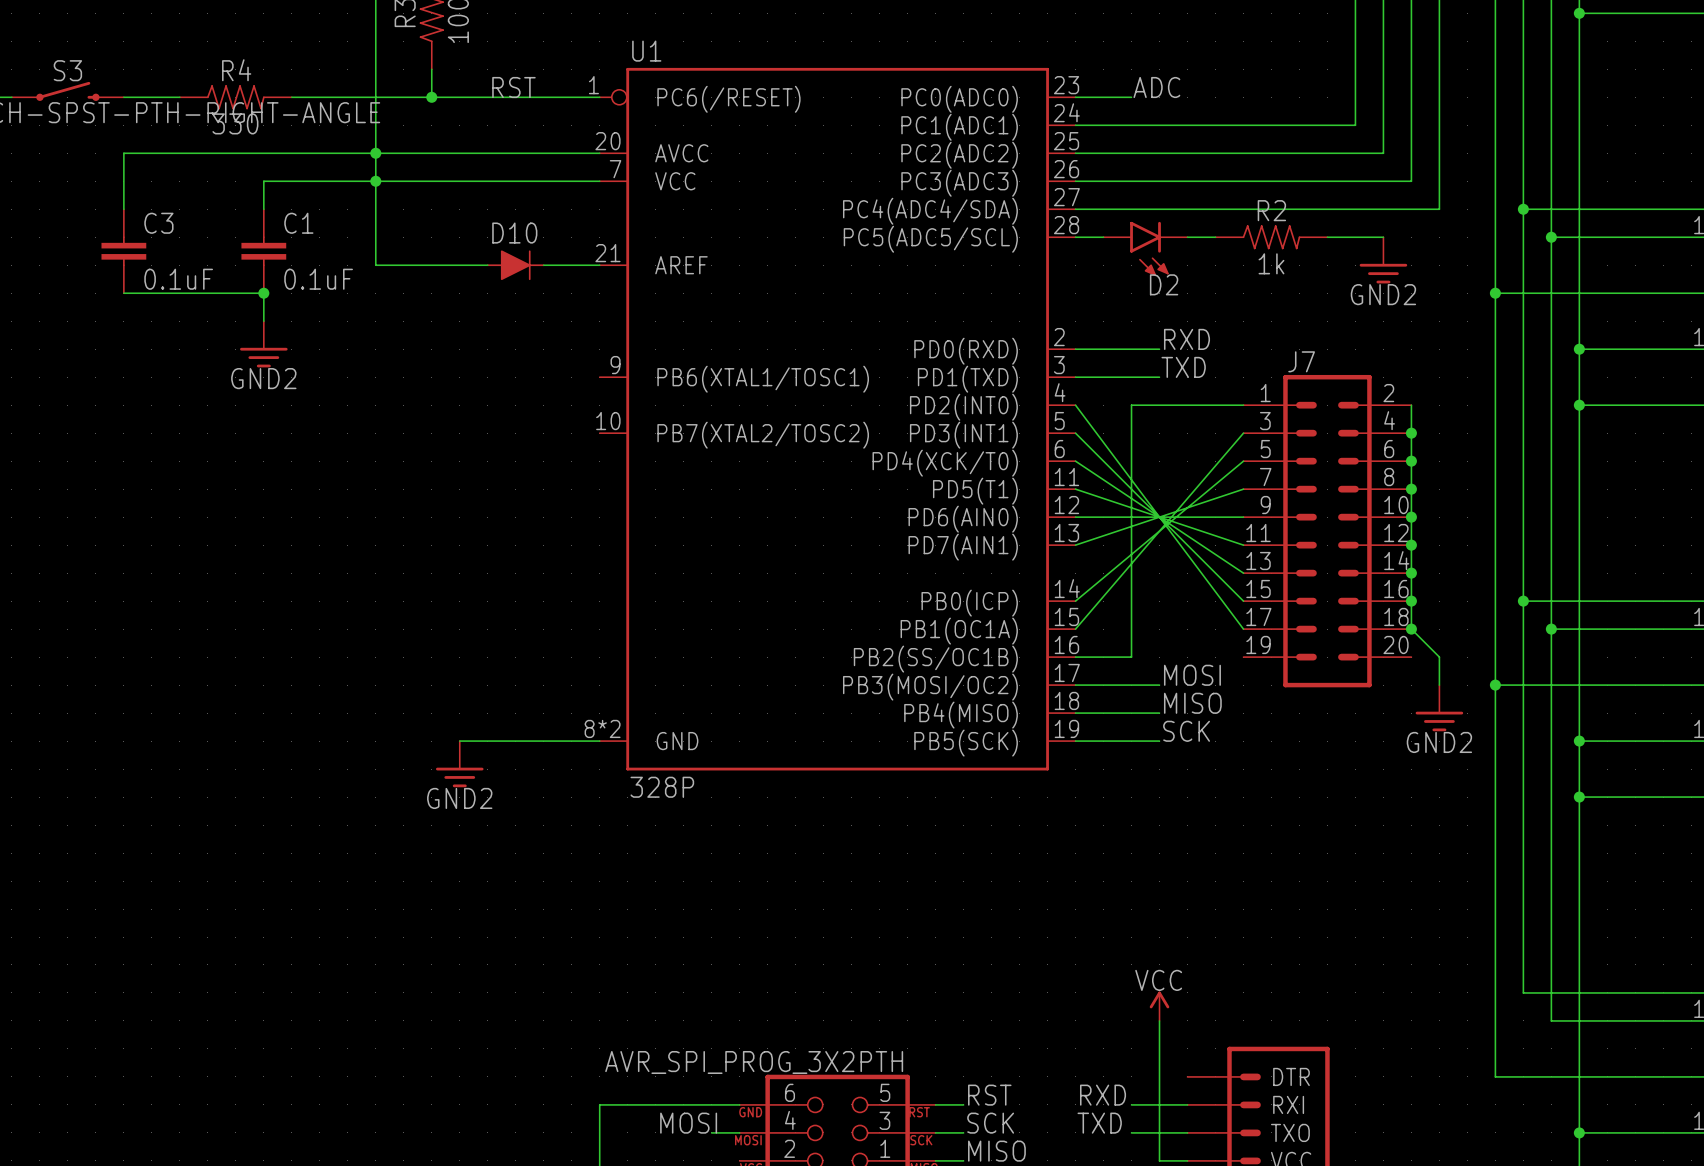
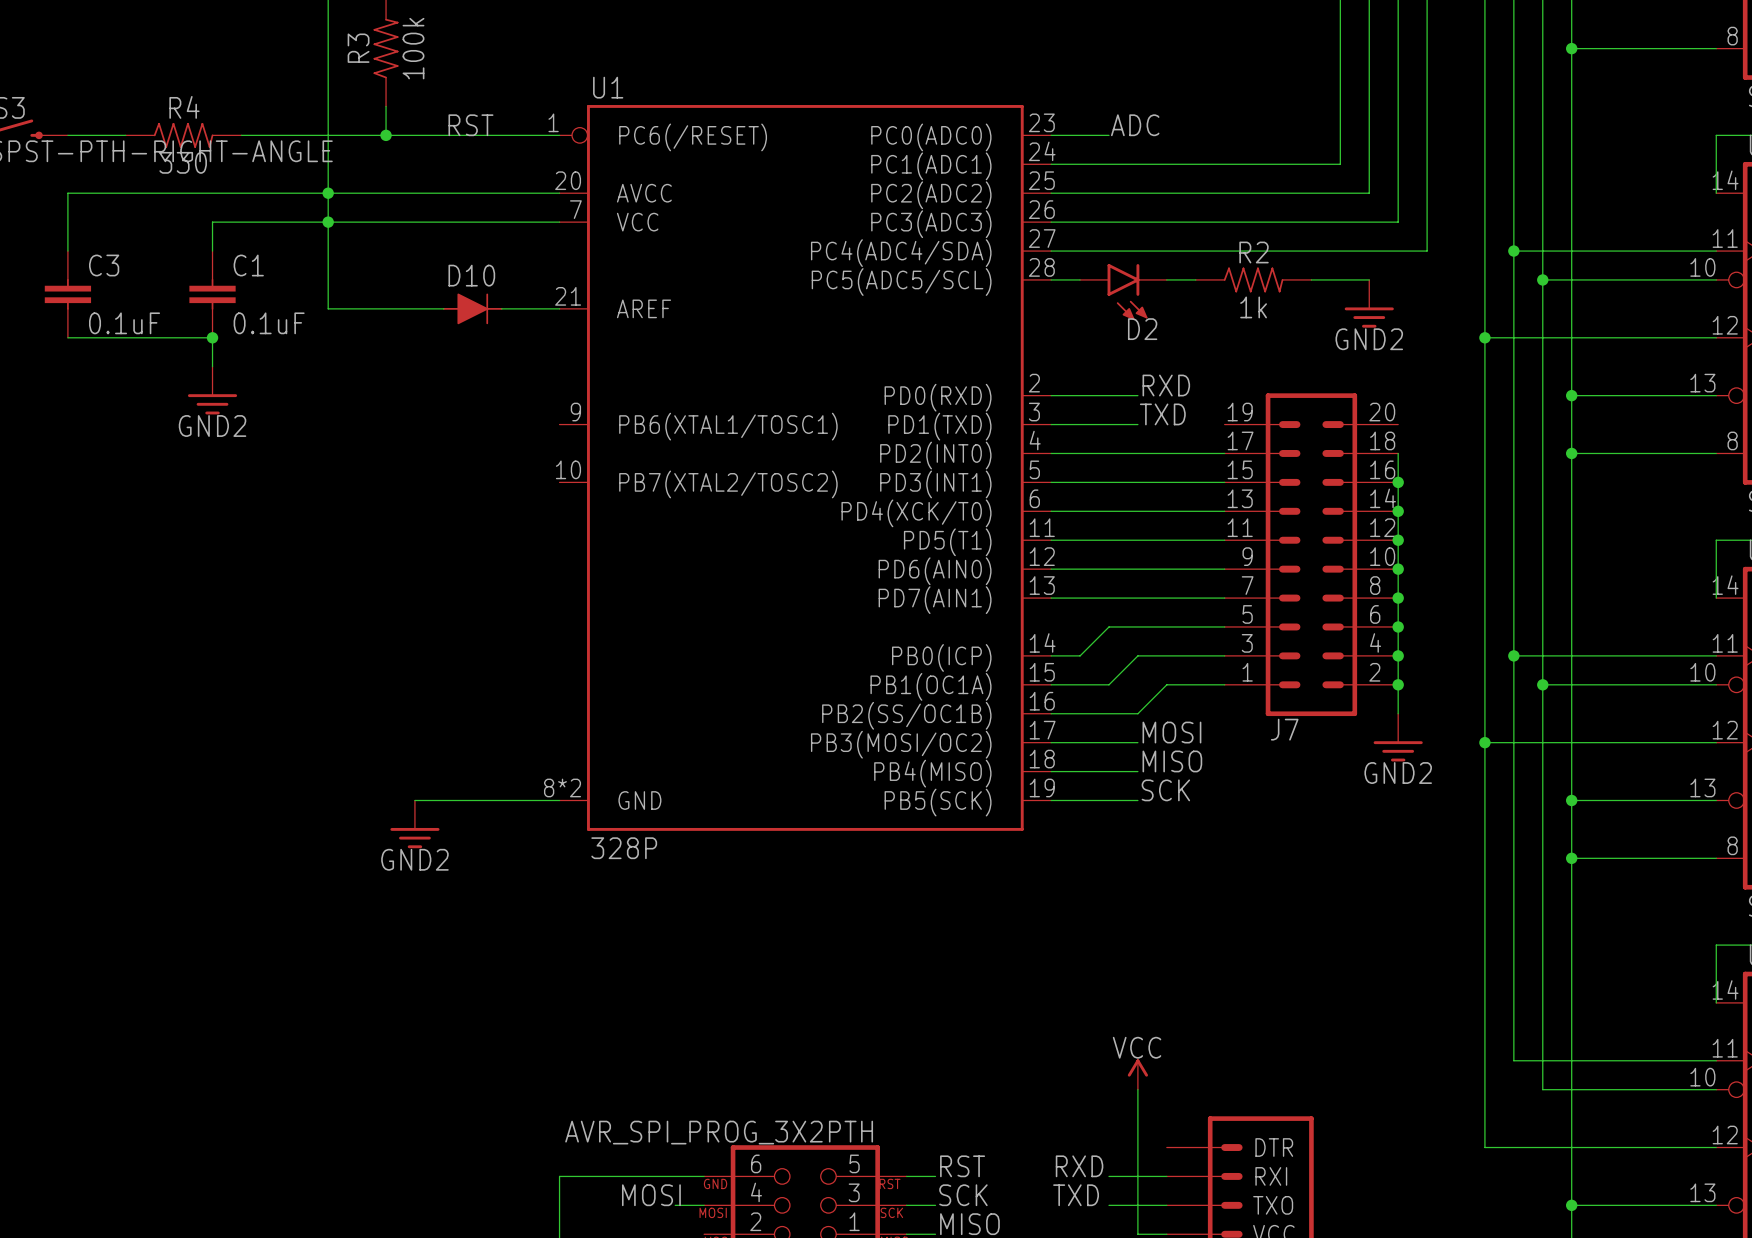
wire: (1075, 405) (1243, 629) -> (1051, 453) (1108, 453)
wire: (1131, 405) (1131, 657) -> (1224, 684) (1166, 684) (1137, 713) (1108, 713)
wire: (1075, 433) (1243, 601) -> (1051, 482) (1224, 482)
wire: (1243, 433) (1075, 629) -> (1224, 655) (1137, 655) (1108, 684) (1051, 684)
wire: (1075, 461) (1243, 573) -> (1051, 511) (1224, 511)
wire: (1243, 461) (1075, 601) -> (1224, 626) (1108, 626) (1080, 655) (1051, 655)
wire: (1075, 489) (1243, 545) -> (1051, 540) (1224, 540)
wire: (1243, 489) (1075, 545) -> (1224, 598) (1051, 598)
J7 flip: as is (1327, 531) -> up-down (1311, 554)
wire: (1411, 629) (1439, 657) (1439, 685) -> (1398, 684) (1398, 713)
power symbol position: GND2 (1439, 708) -> GND2 (1398, 737)

